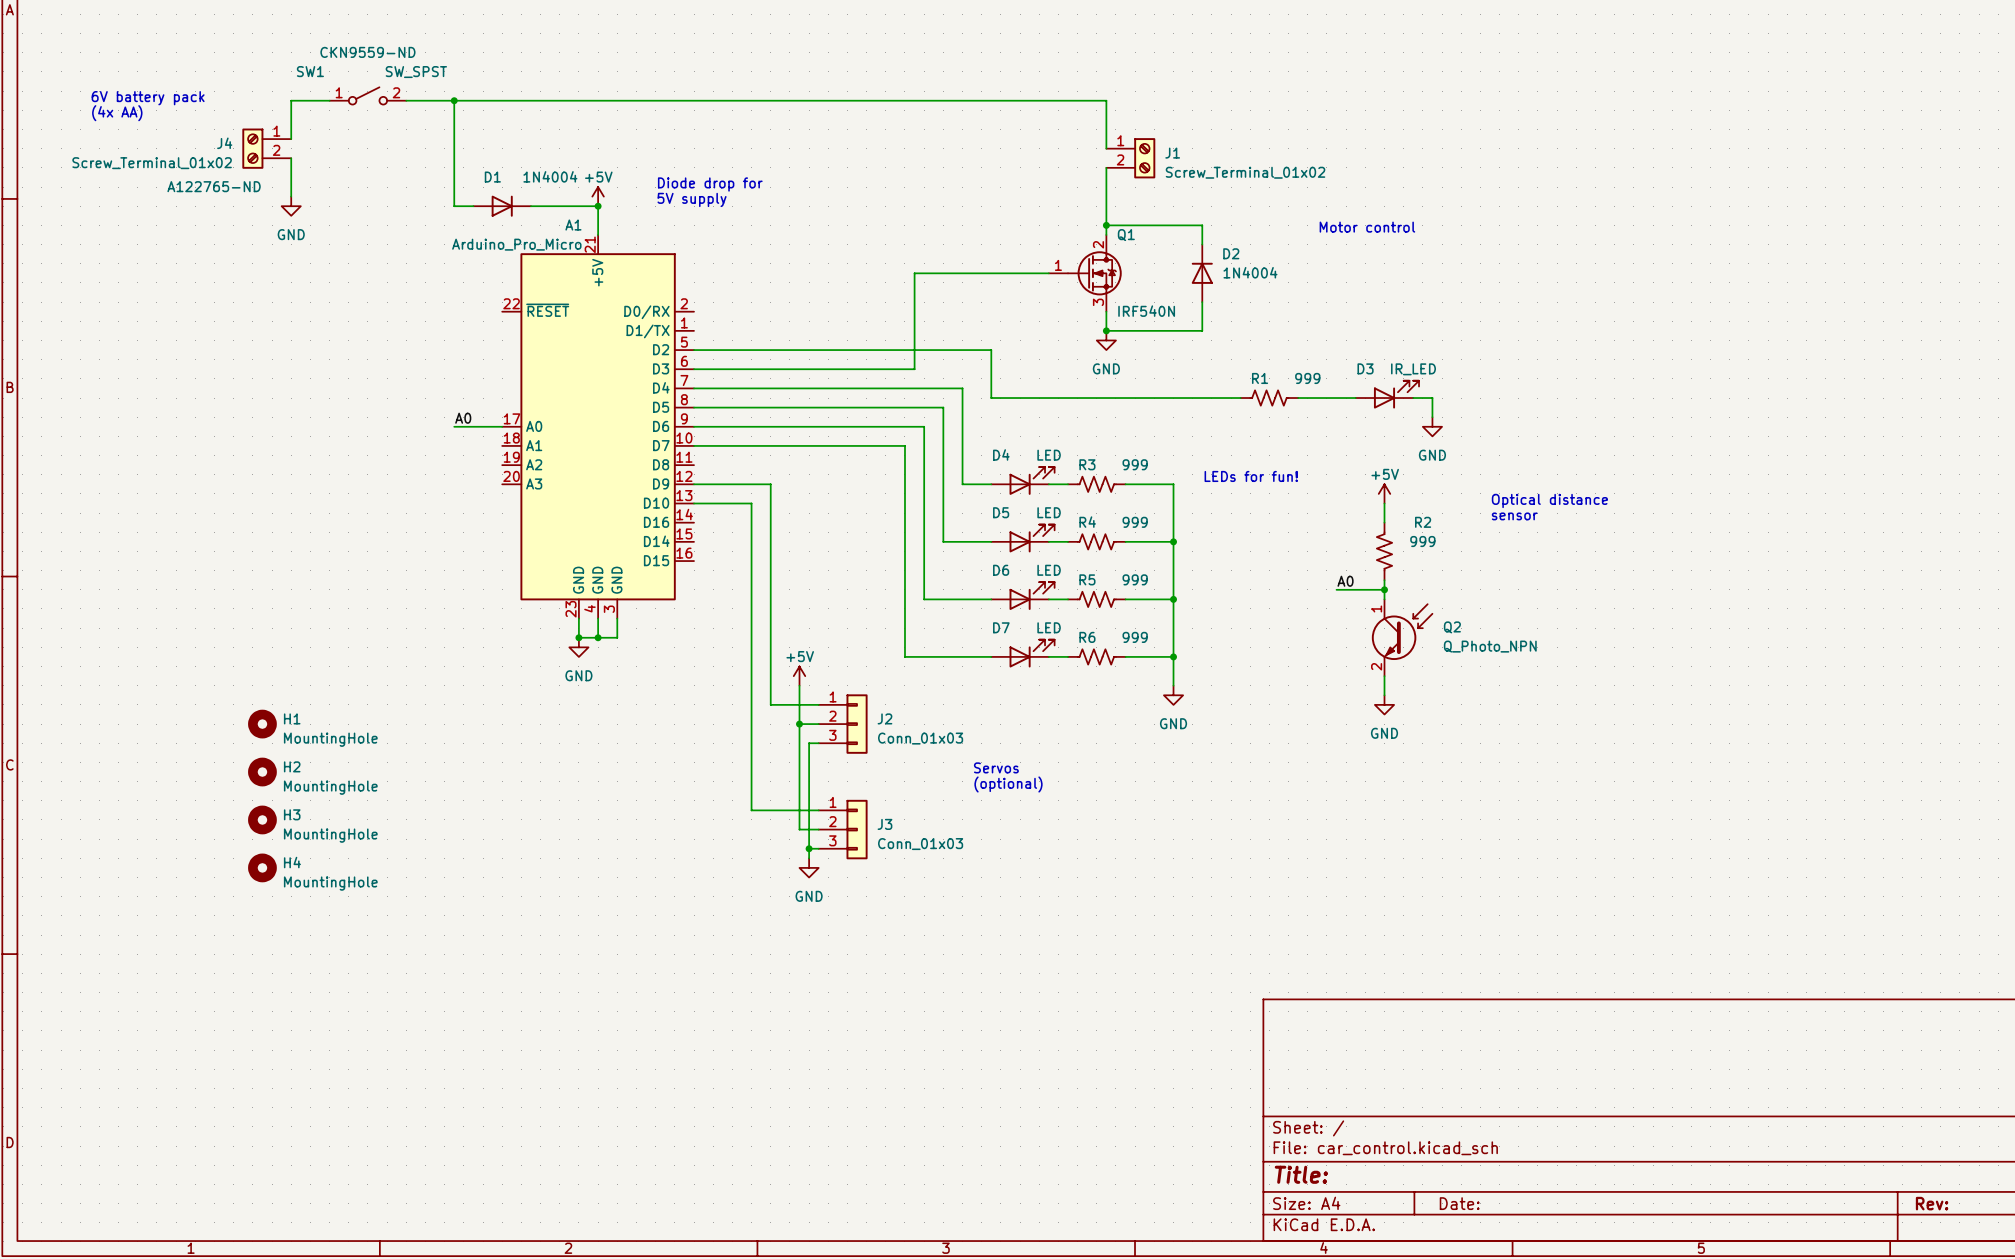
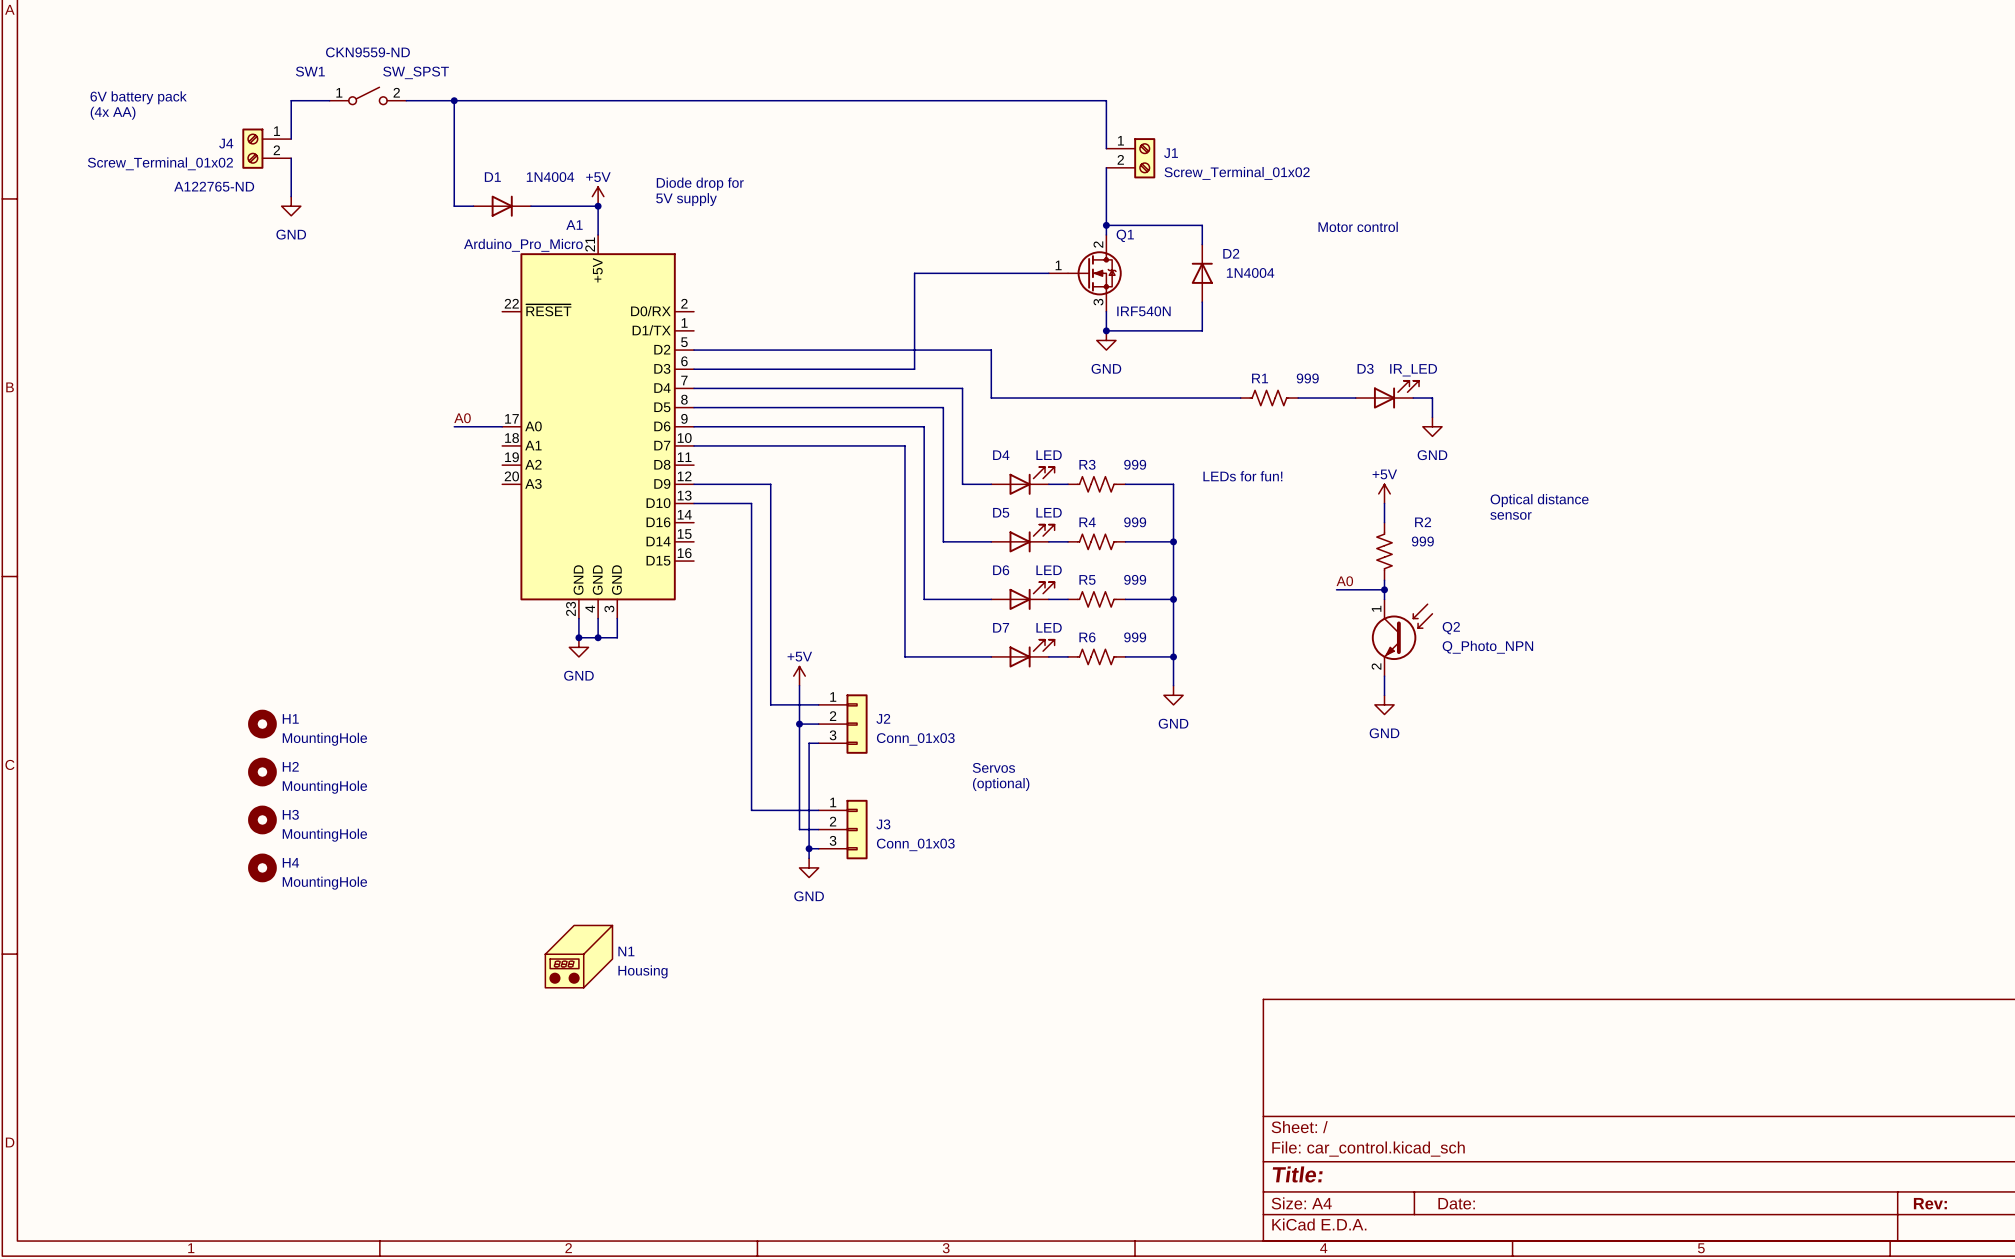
N1: none -> Housing (578, 956)

